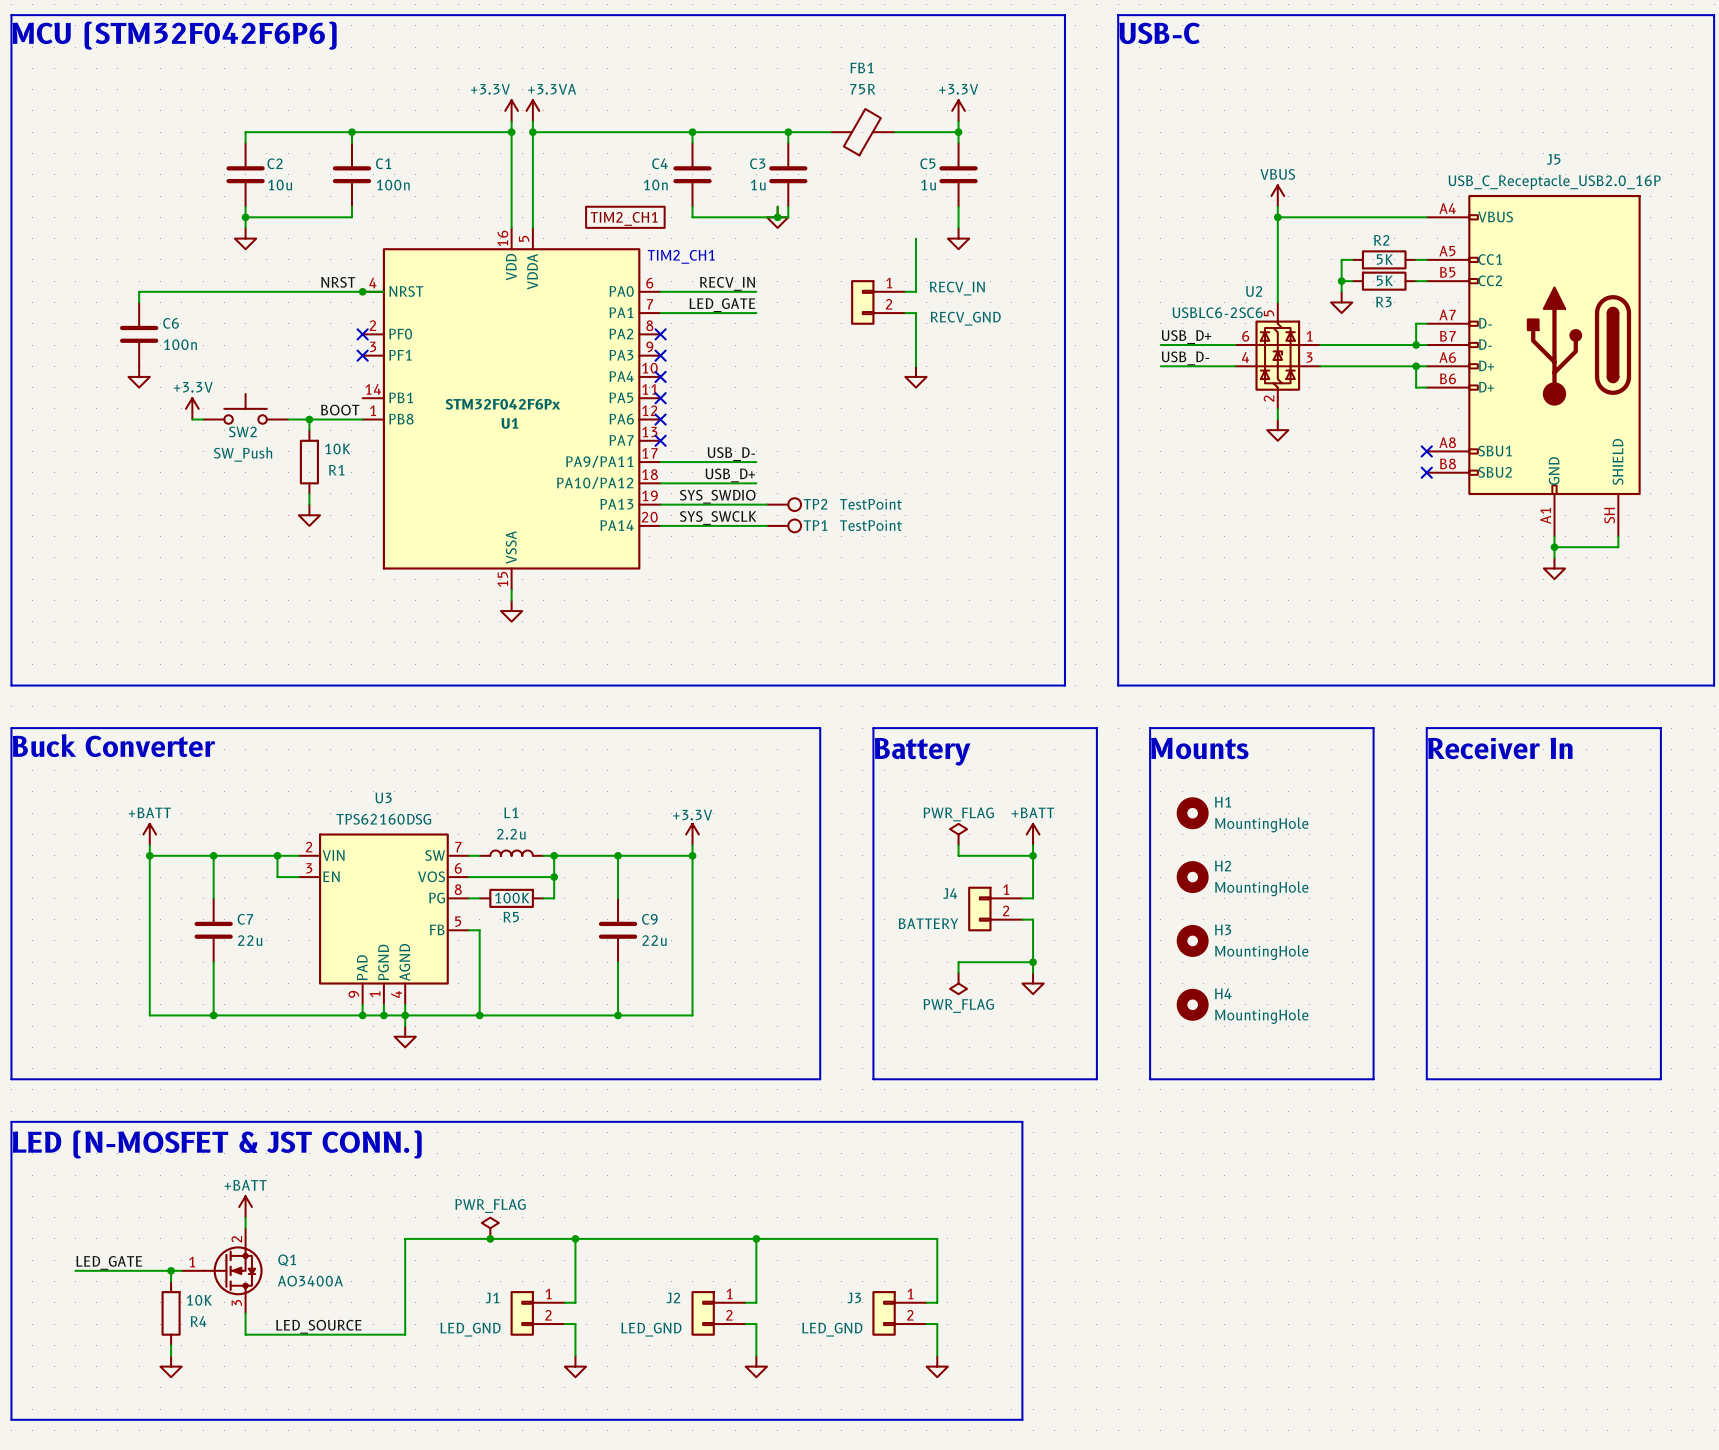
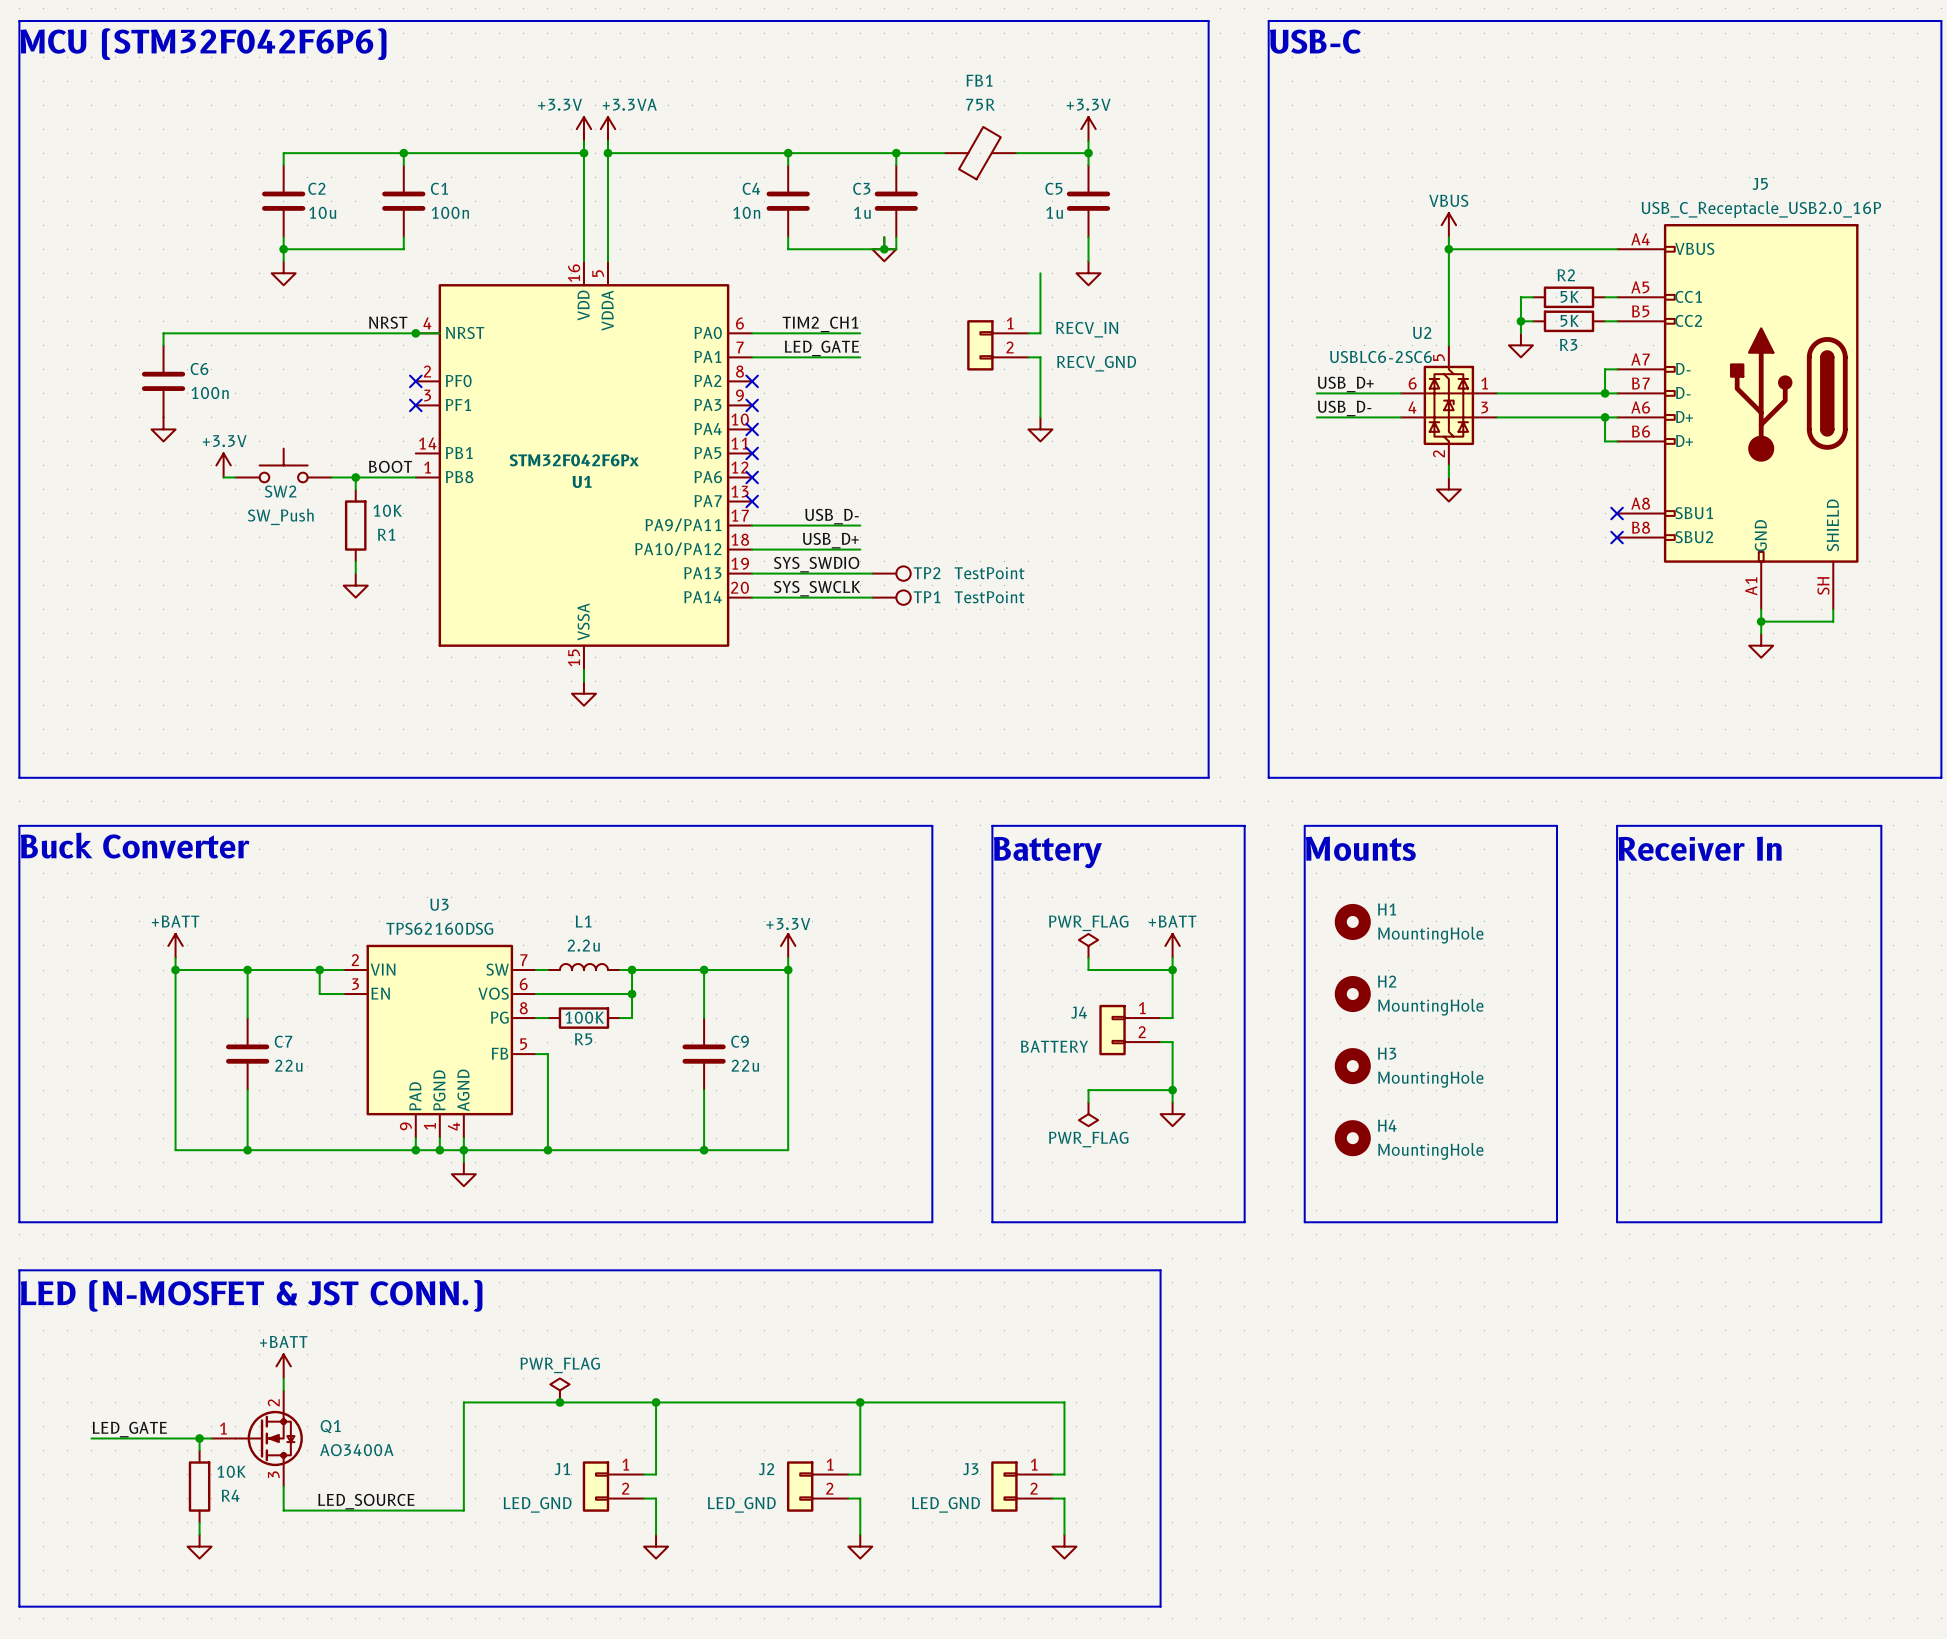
global label: TIM2_CH1 (624, 218) -> none
text: TIM2_CH1 (681, 256) -> none
label: RECV_IN (727, 283) -> TIM2_CH1 (820, 324)

